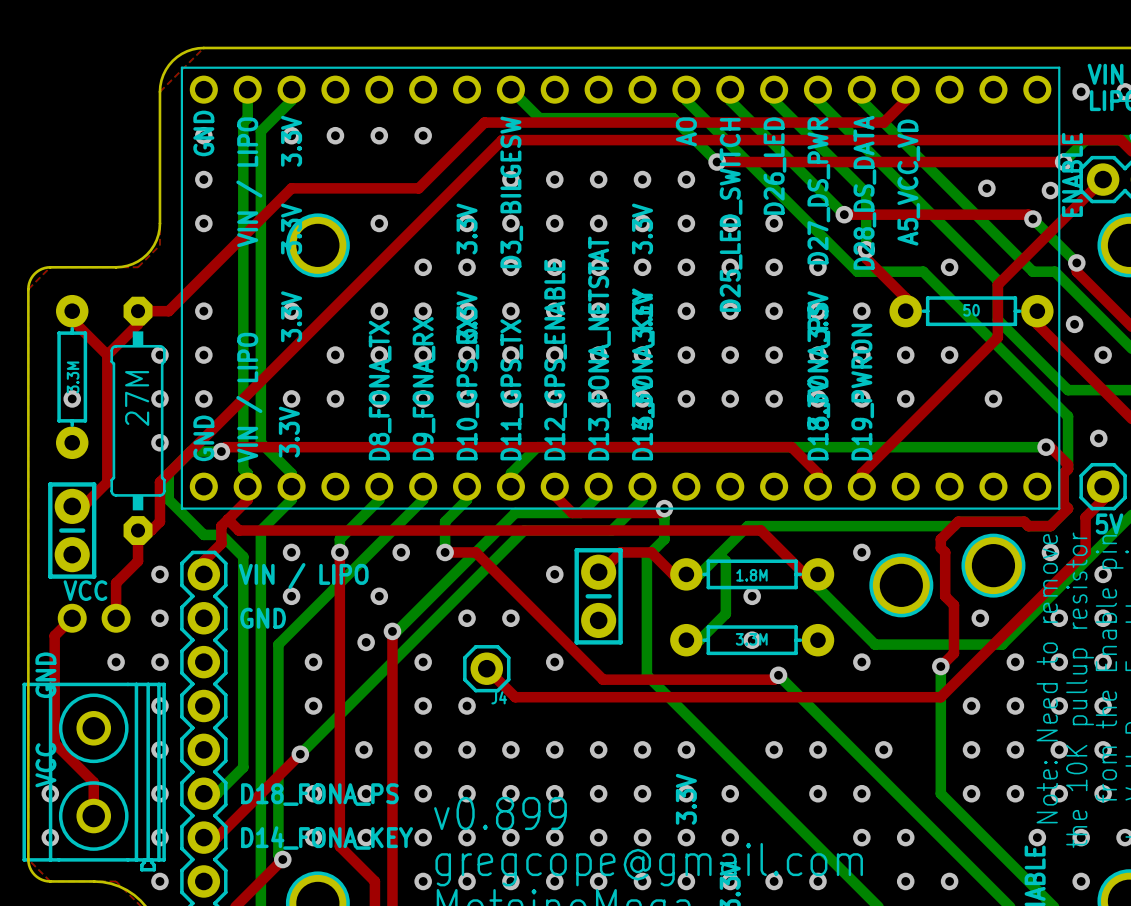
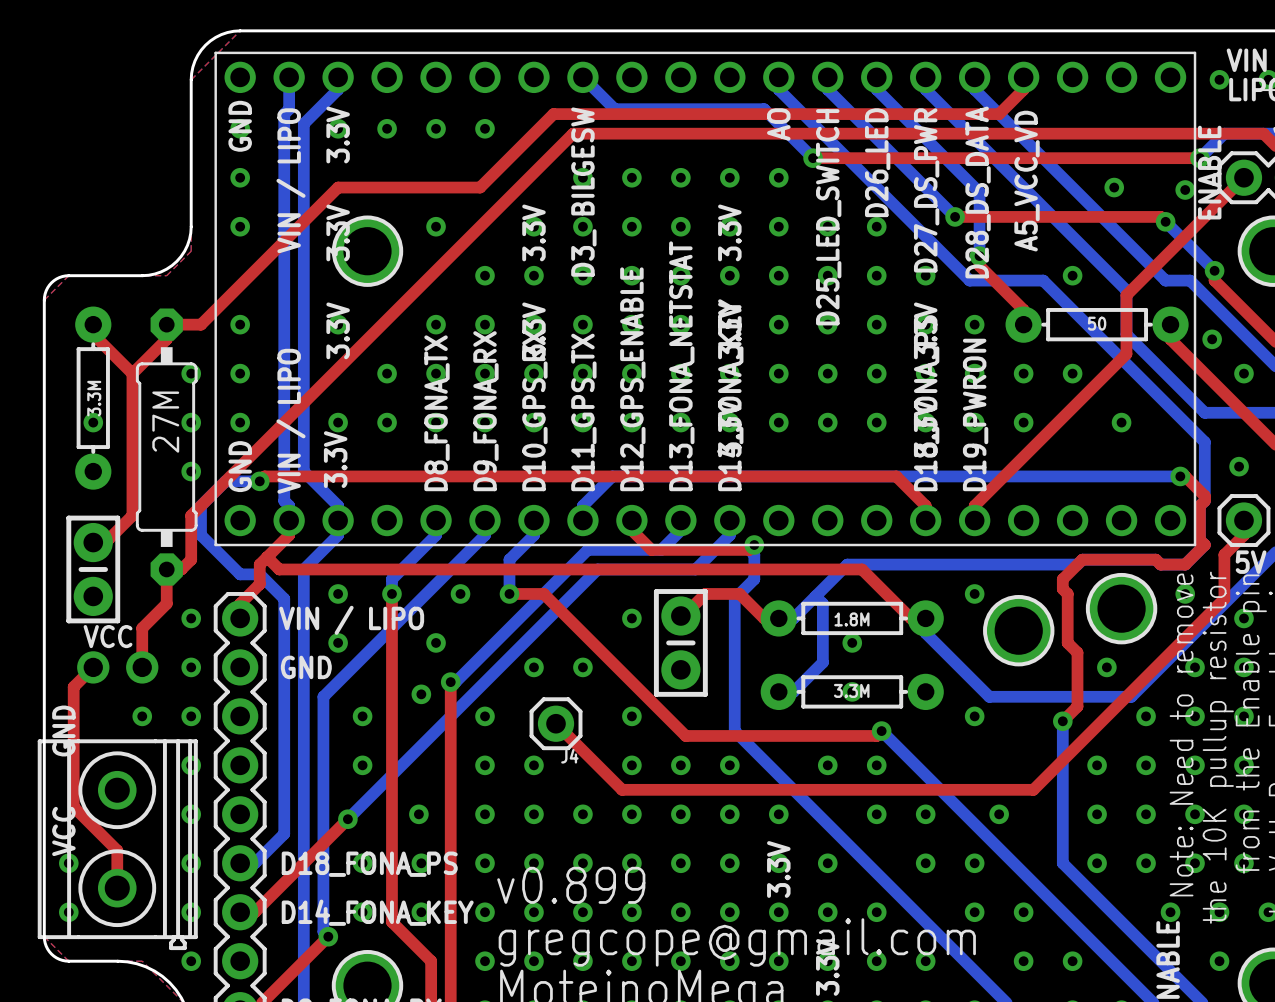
top track: (1085, 552) (940, 697) (515, 697) -> (1224, 593) (1224, 598) (1033, 789) (622, 789) (587, 755)
via: none -> (631, 765)
via: none -> (680, 765)
via: none -> (729, 765)
via: none -> (827, 765)
via: none -> (876, 765)
via: none -> (876, 912)

